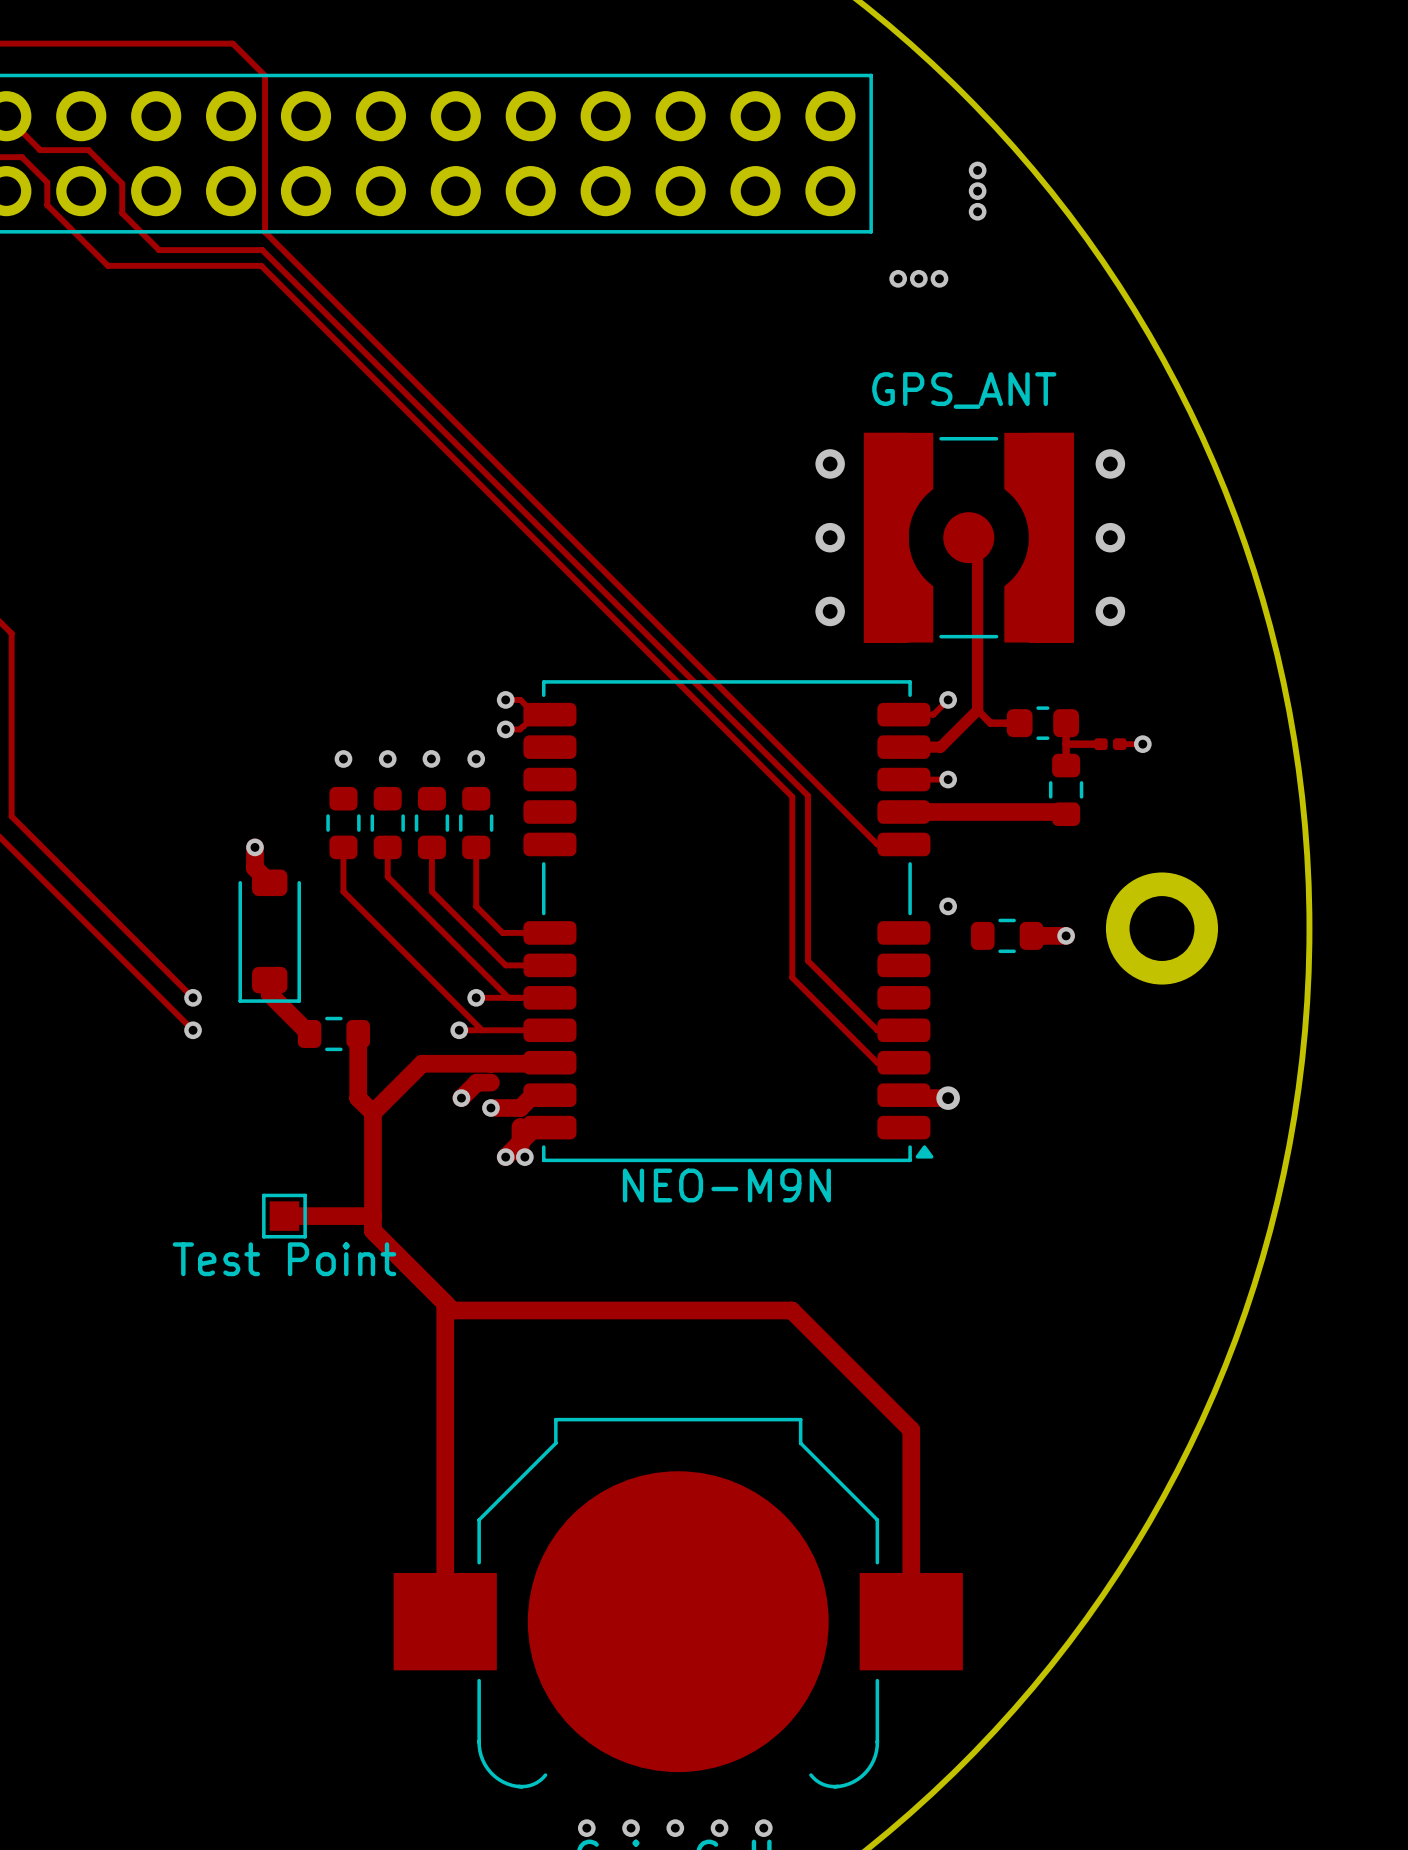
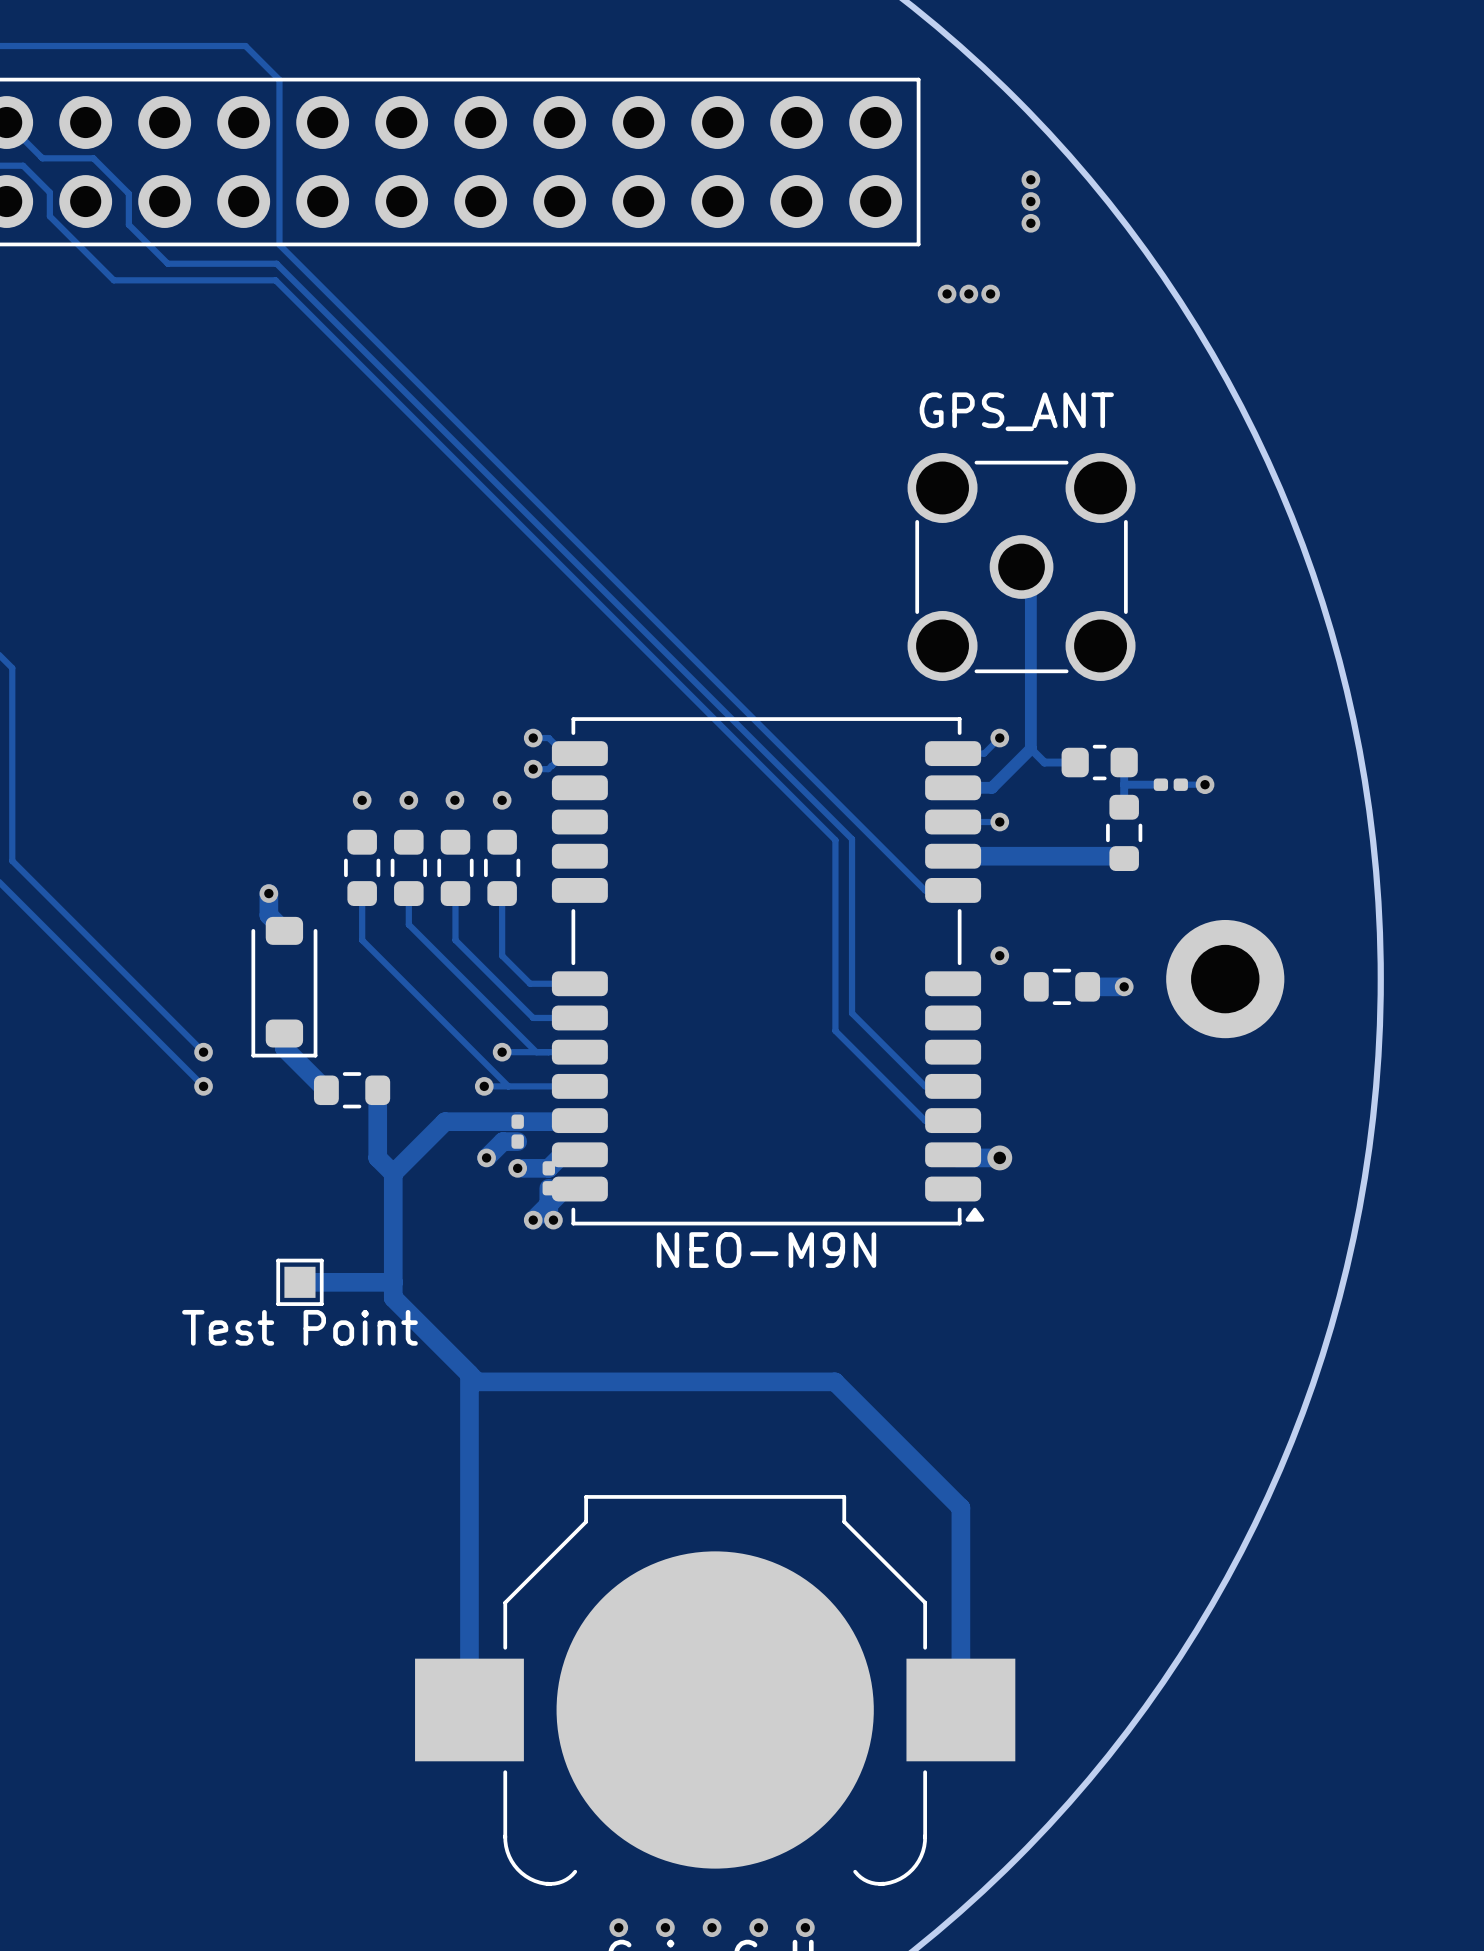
part footprint: [863, 432, 1074, 643] -> [907, 452, 1136, 681]
via: (830, 463) -> none
via: (1110, 463) -> none
via: (830, 537) -> none
via: (1110, 537) -> none
via: (830, 611) -> none
via: (1110, 611) -> none

